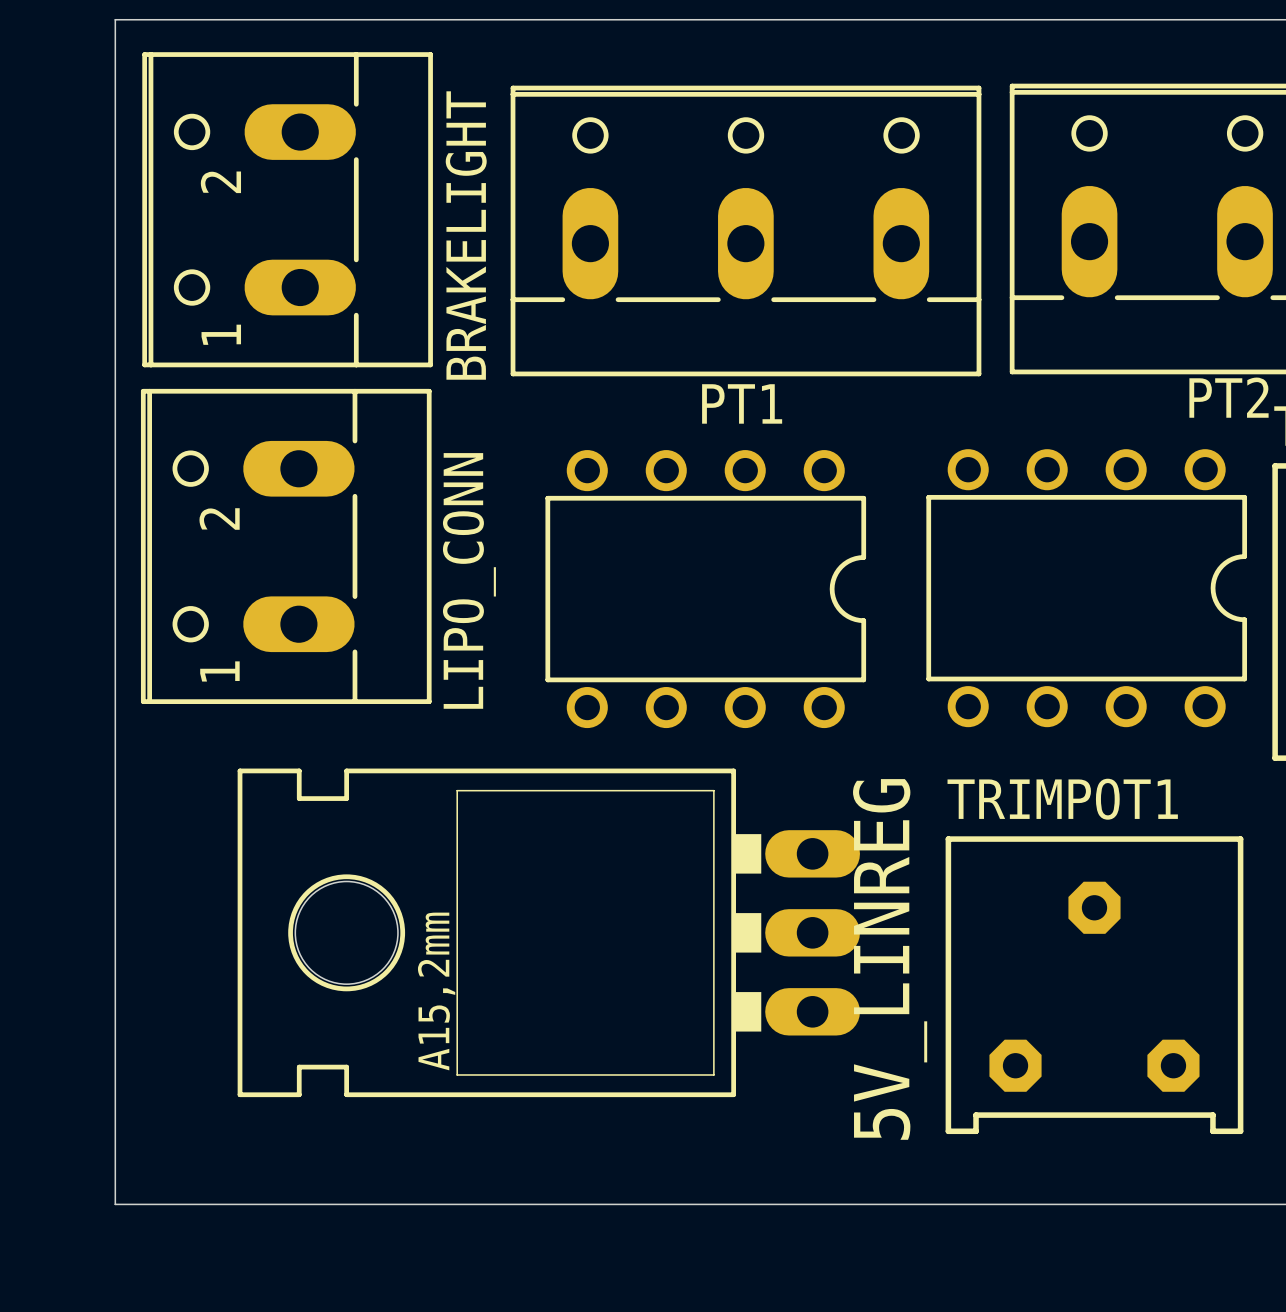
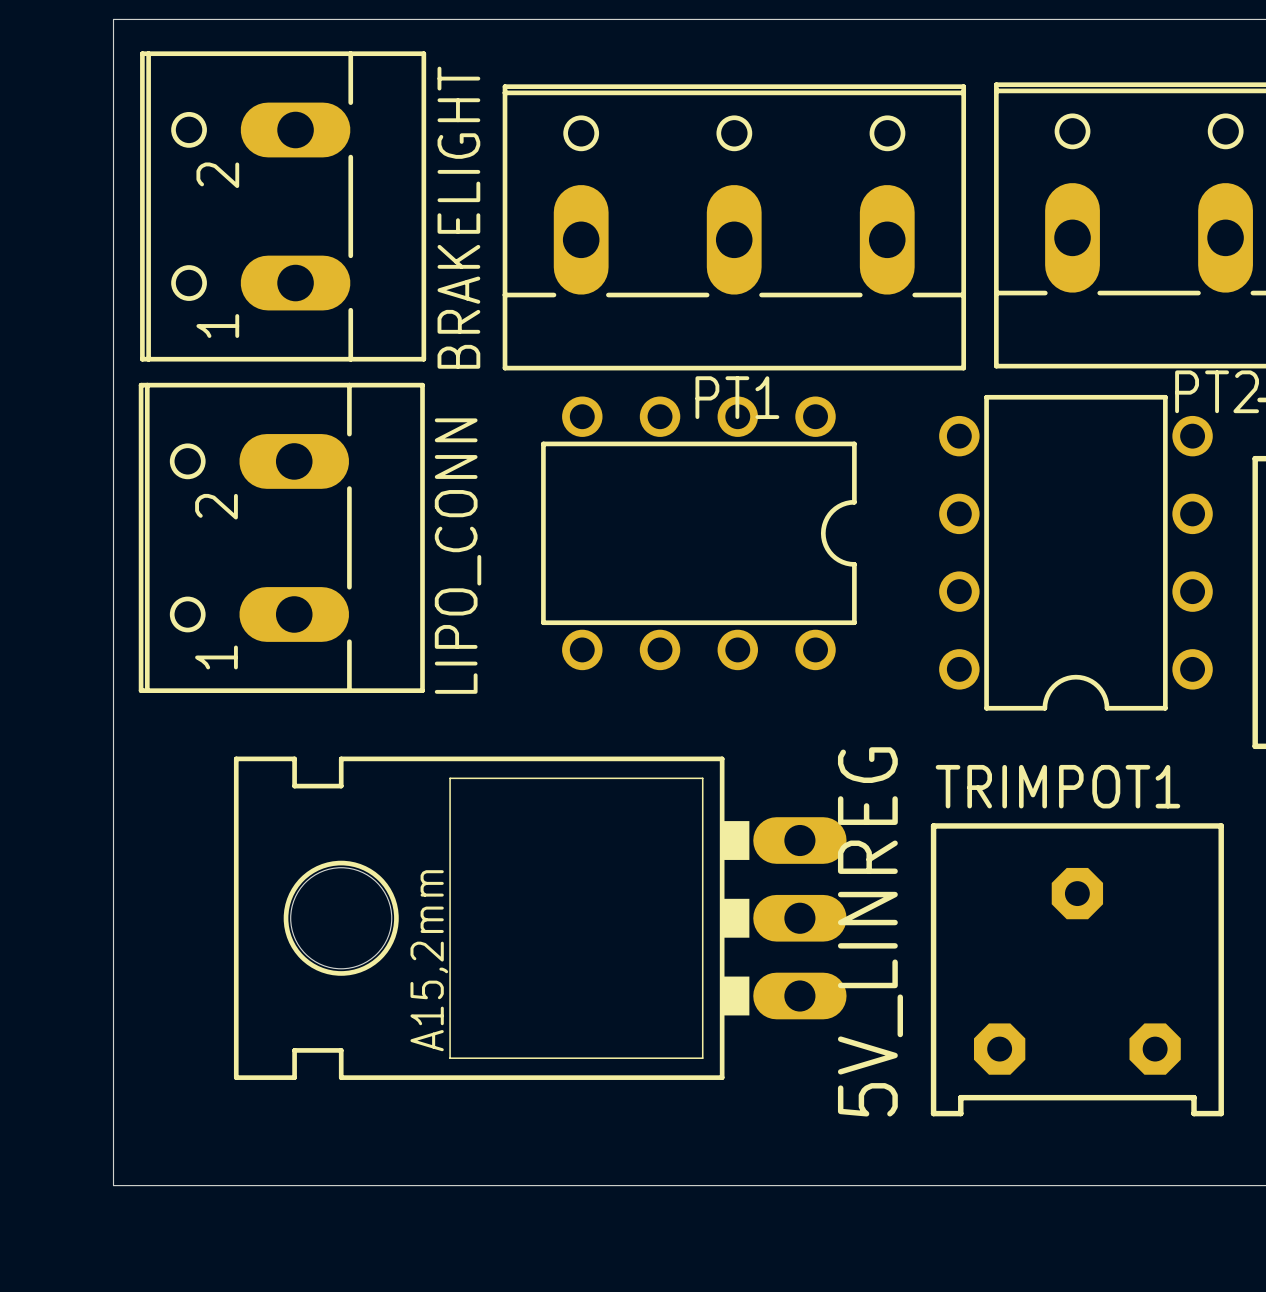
part rotation: 0° (1086, 588) -> 90° clockwise (1075, 552)
part position: (705, 589) -> (698, 533)

